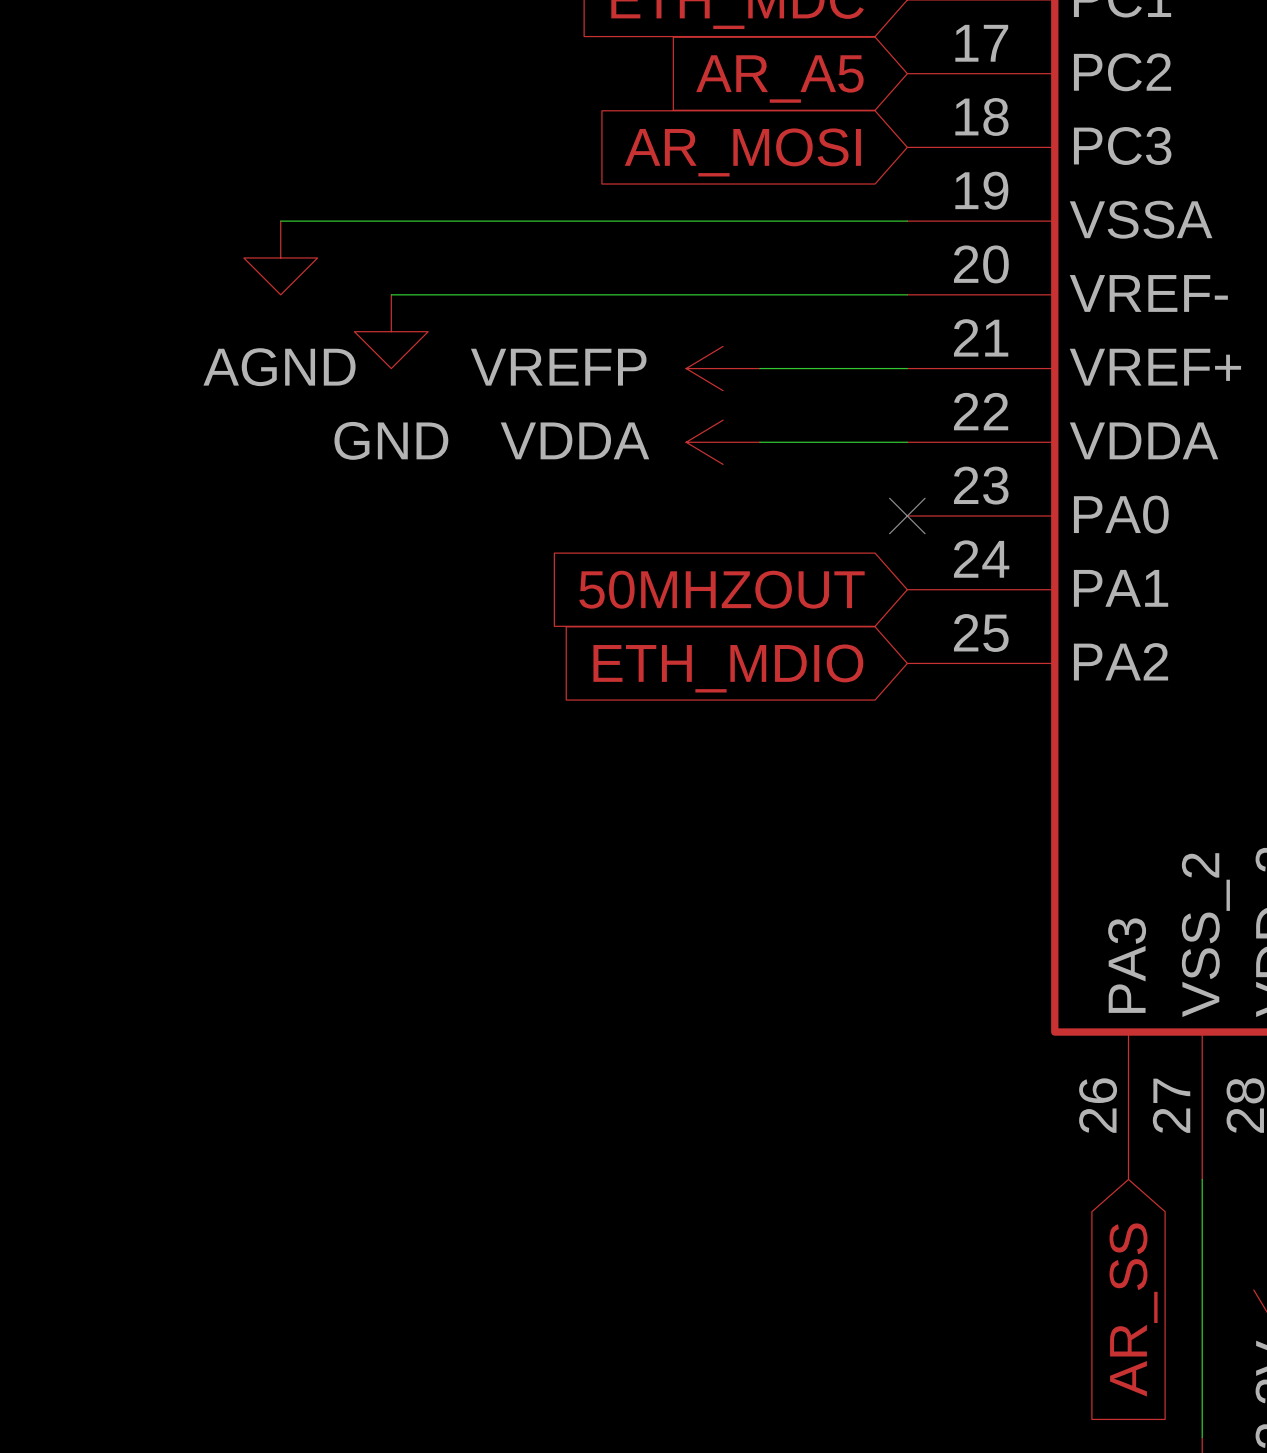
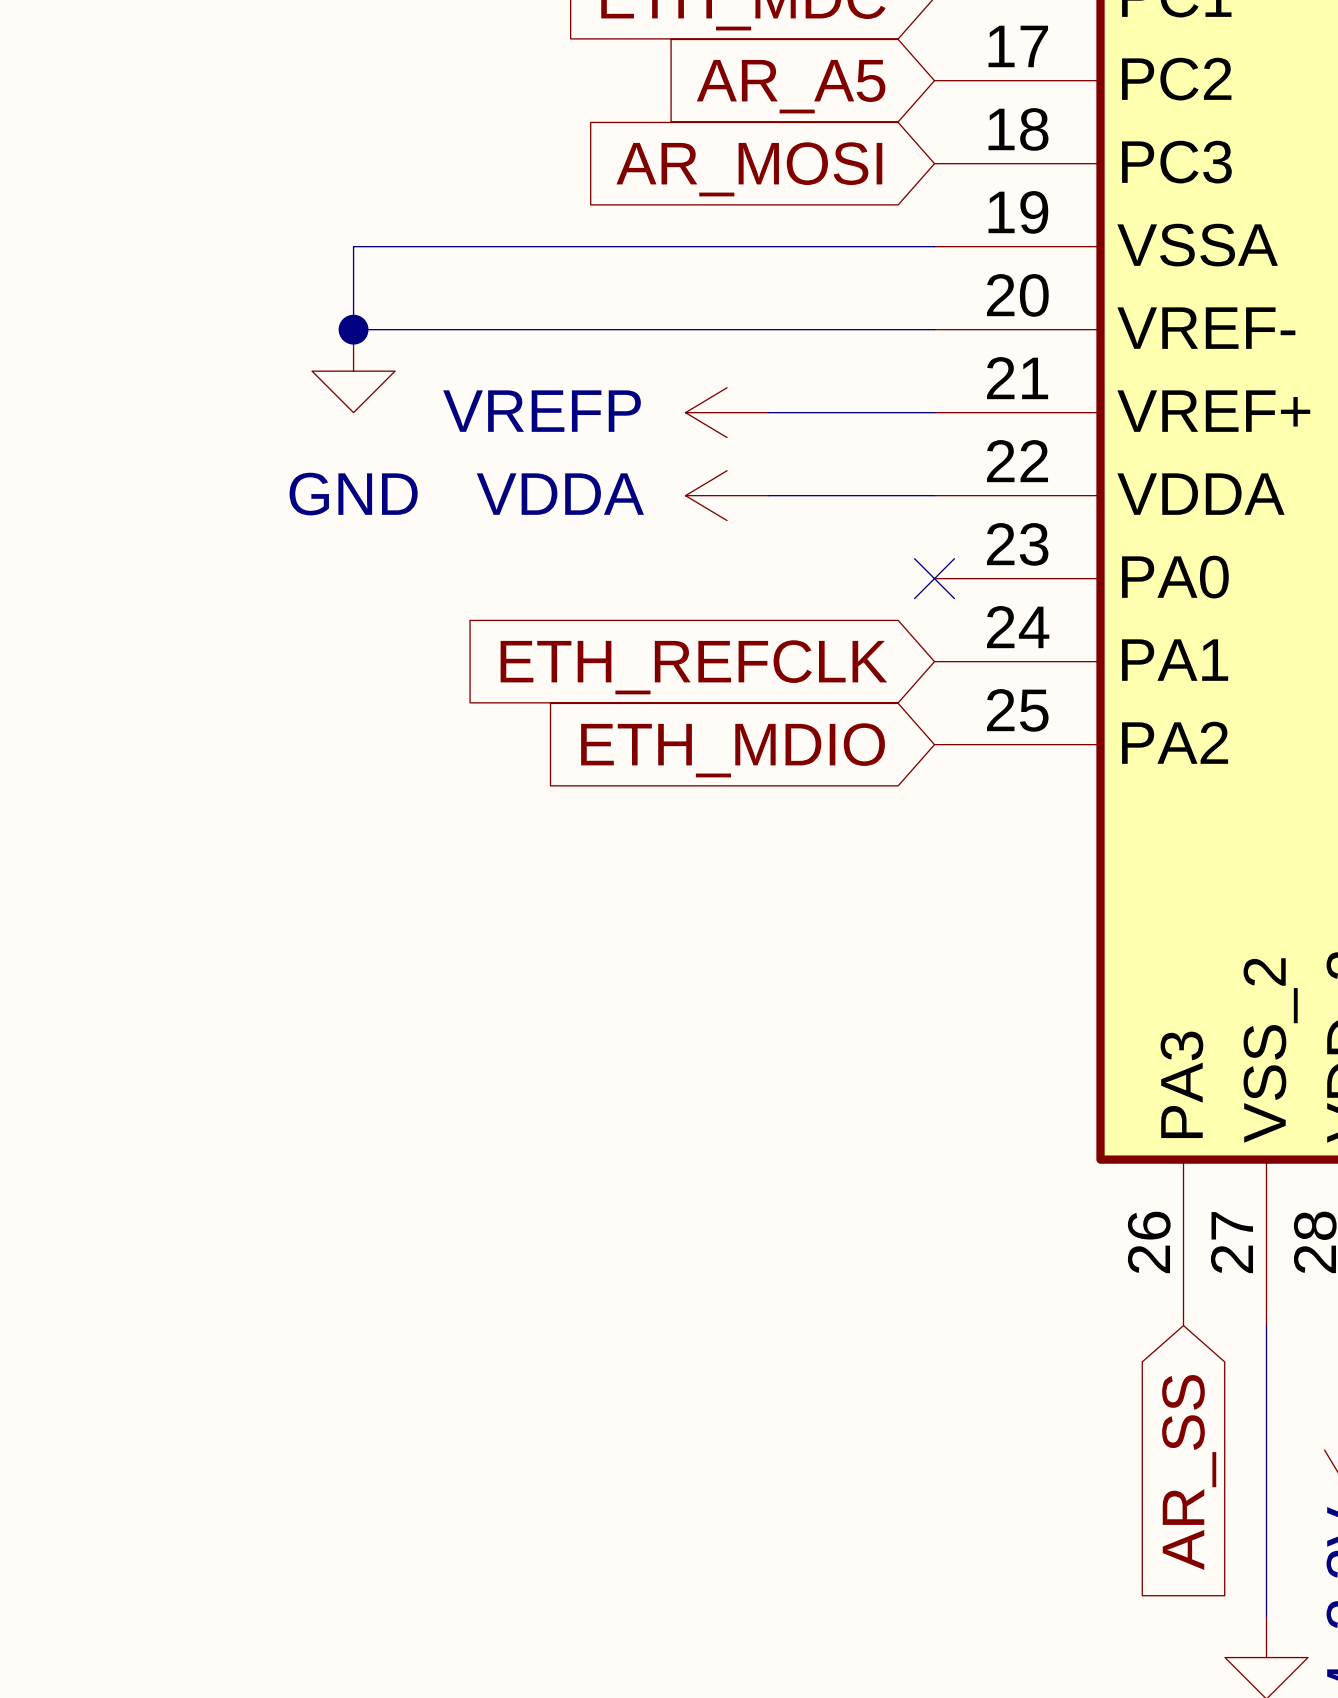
wire: (280, 221) (391, 221) -> (353, 329) (353, 246)
power symbol: AGND (280, 257) -> none
junction: none -> (353, 329)
global label: 50MHZOUT (721, 589) -> ETH_REFCLK (693, 667)

